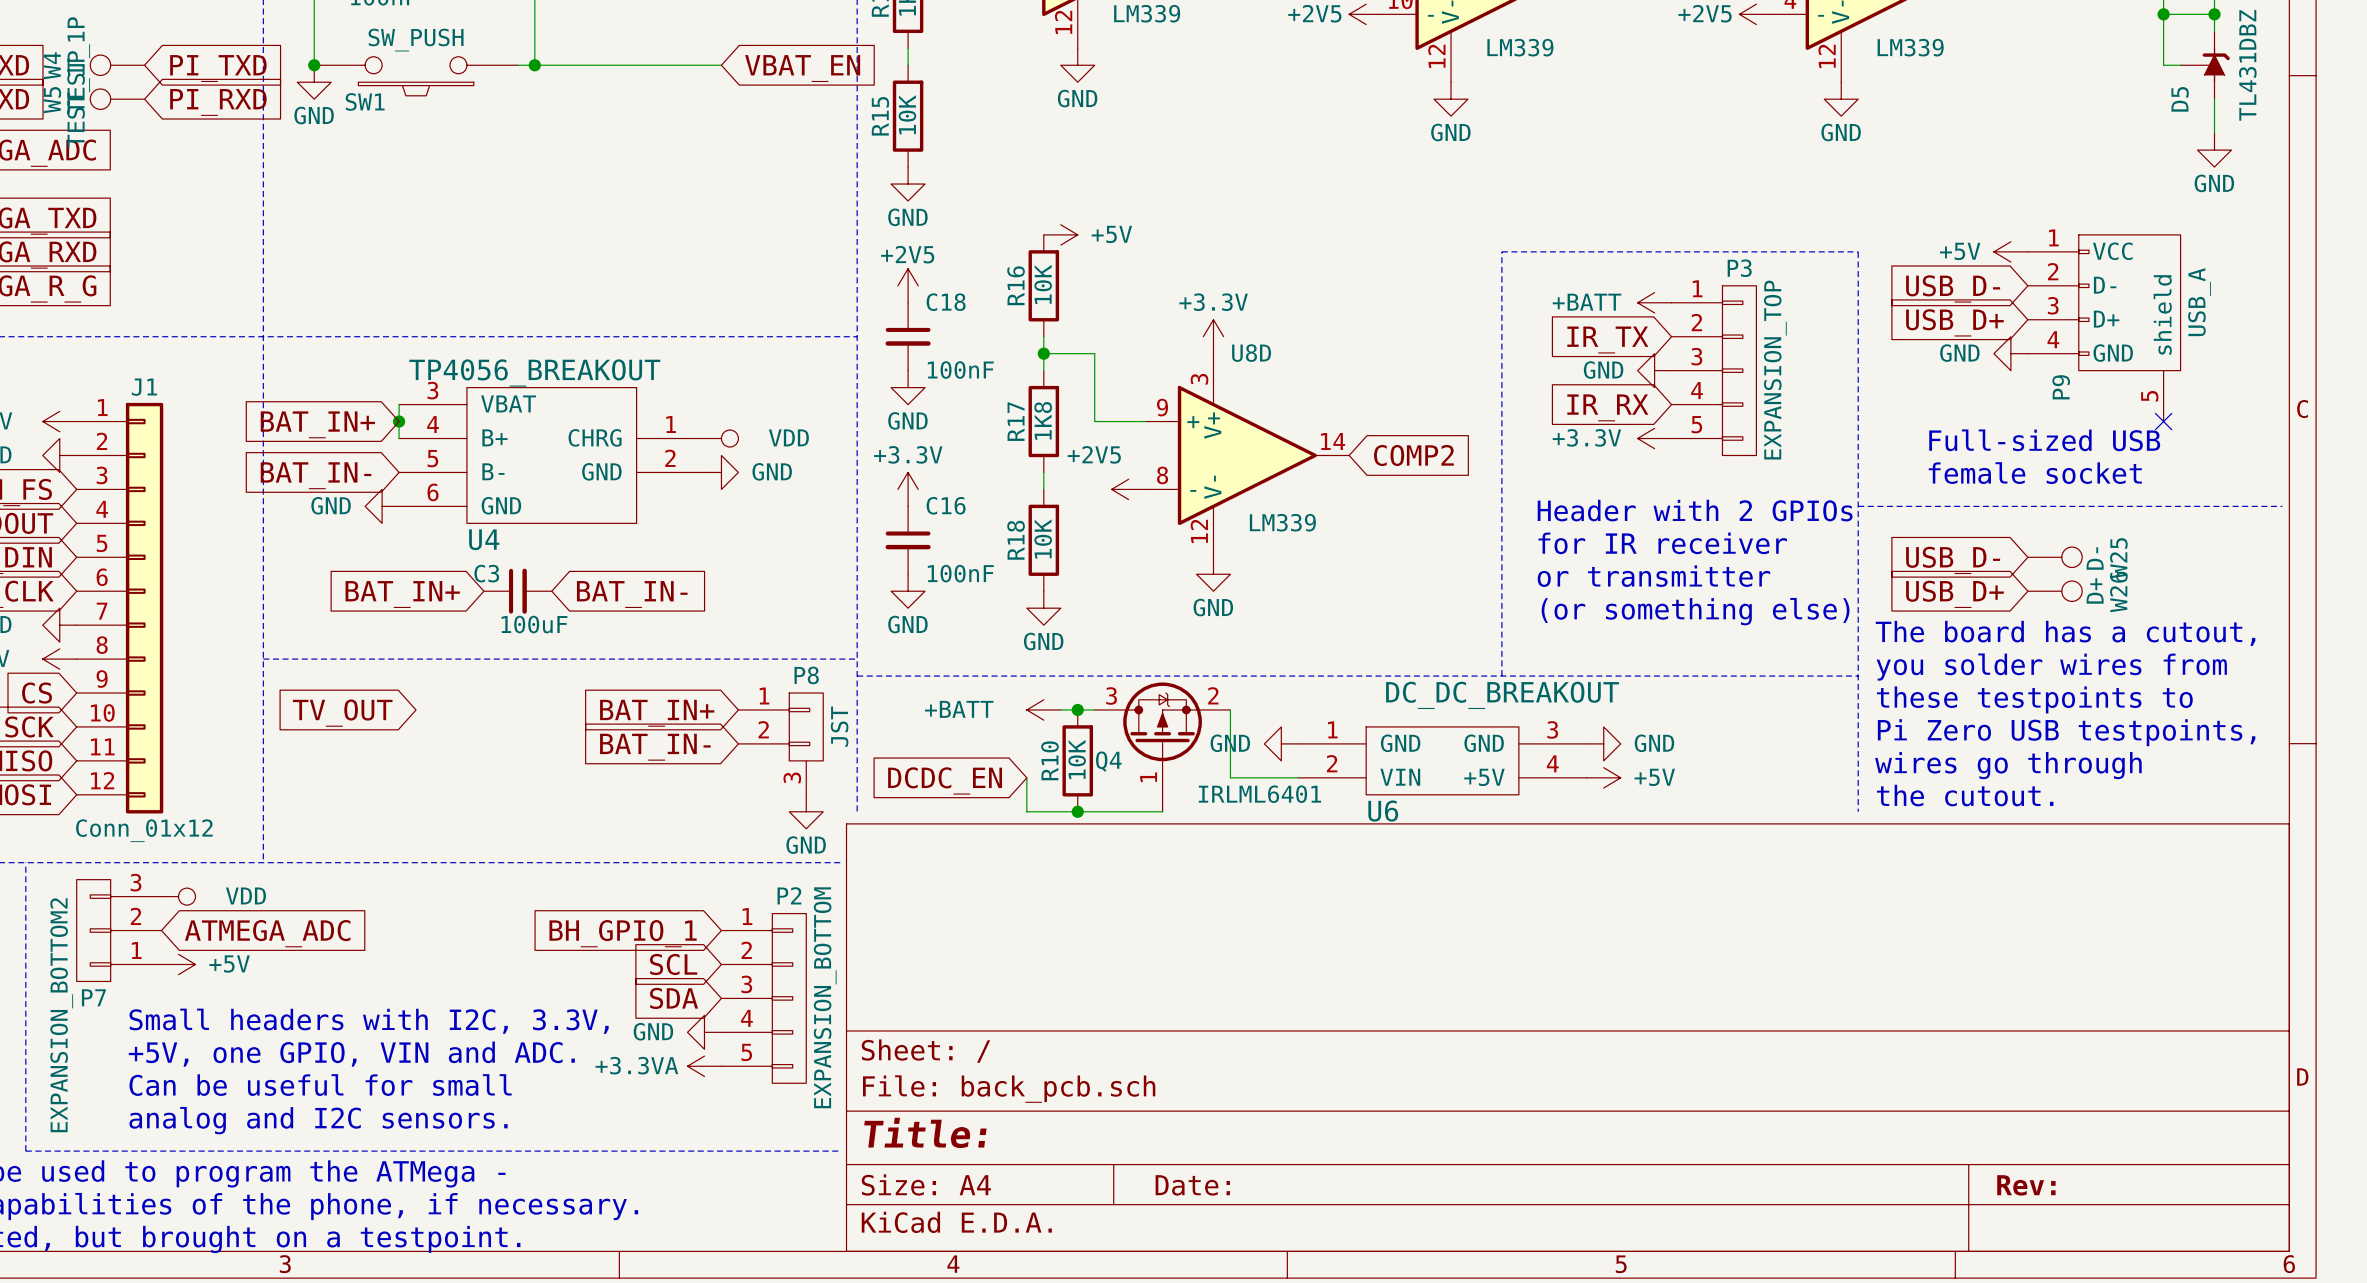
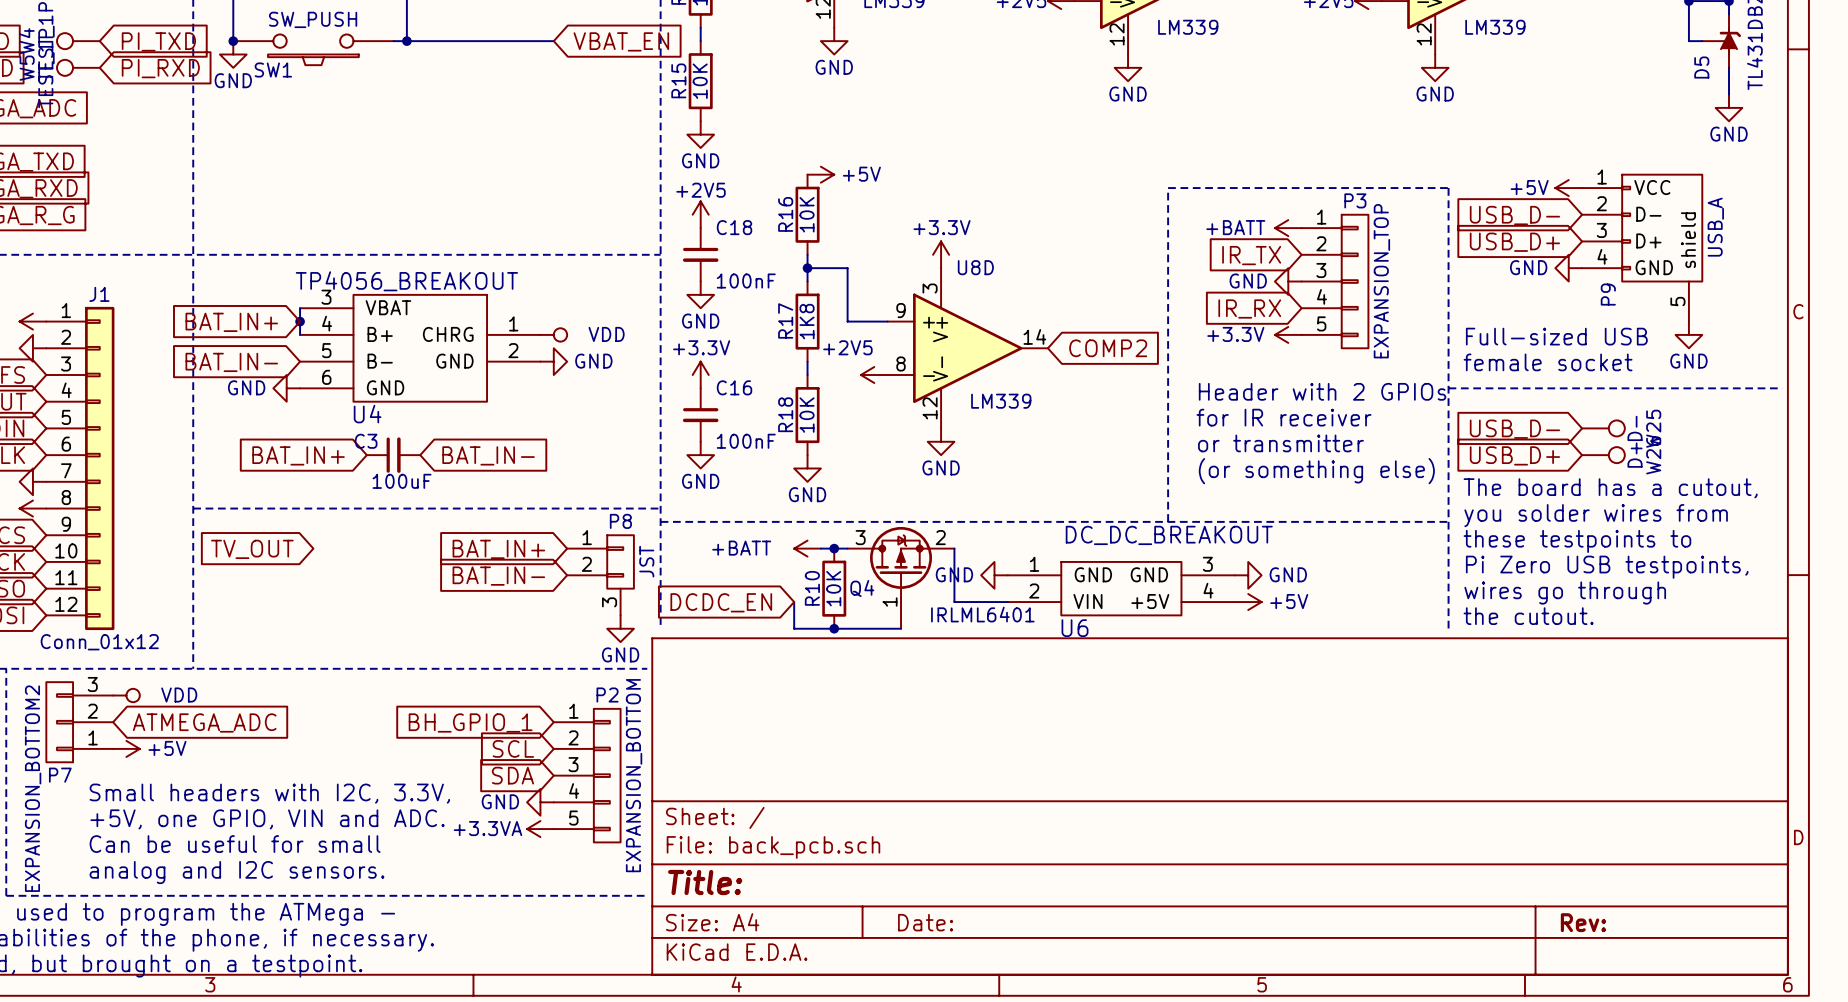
no-connect mark: (2163, 421) -> none
power symbol: none -> GND (1688, 334)
text position: Full-sized USB (2044, 440) -> Full-sized USB (1556, 336)
text position: female socket (2035, 473) -> female socket (1548, 362)

